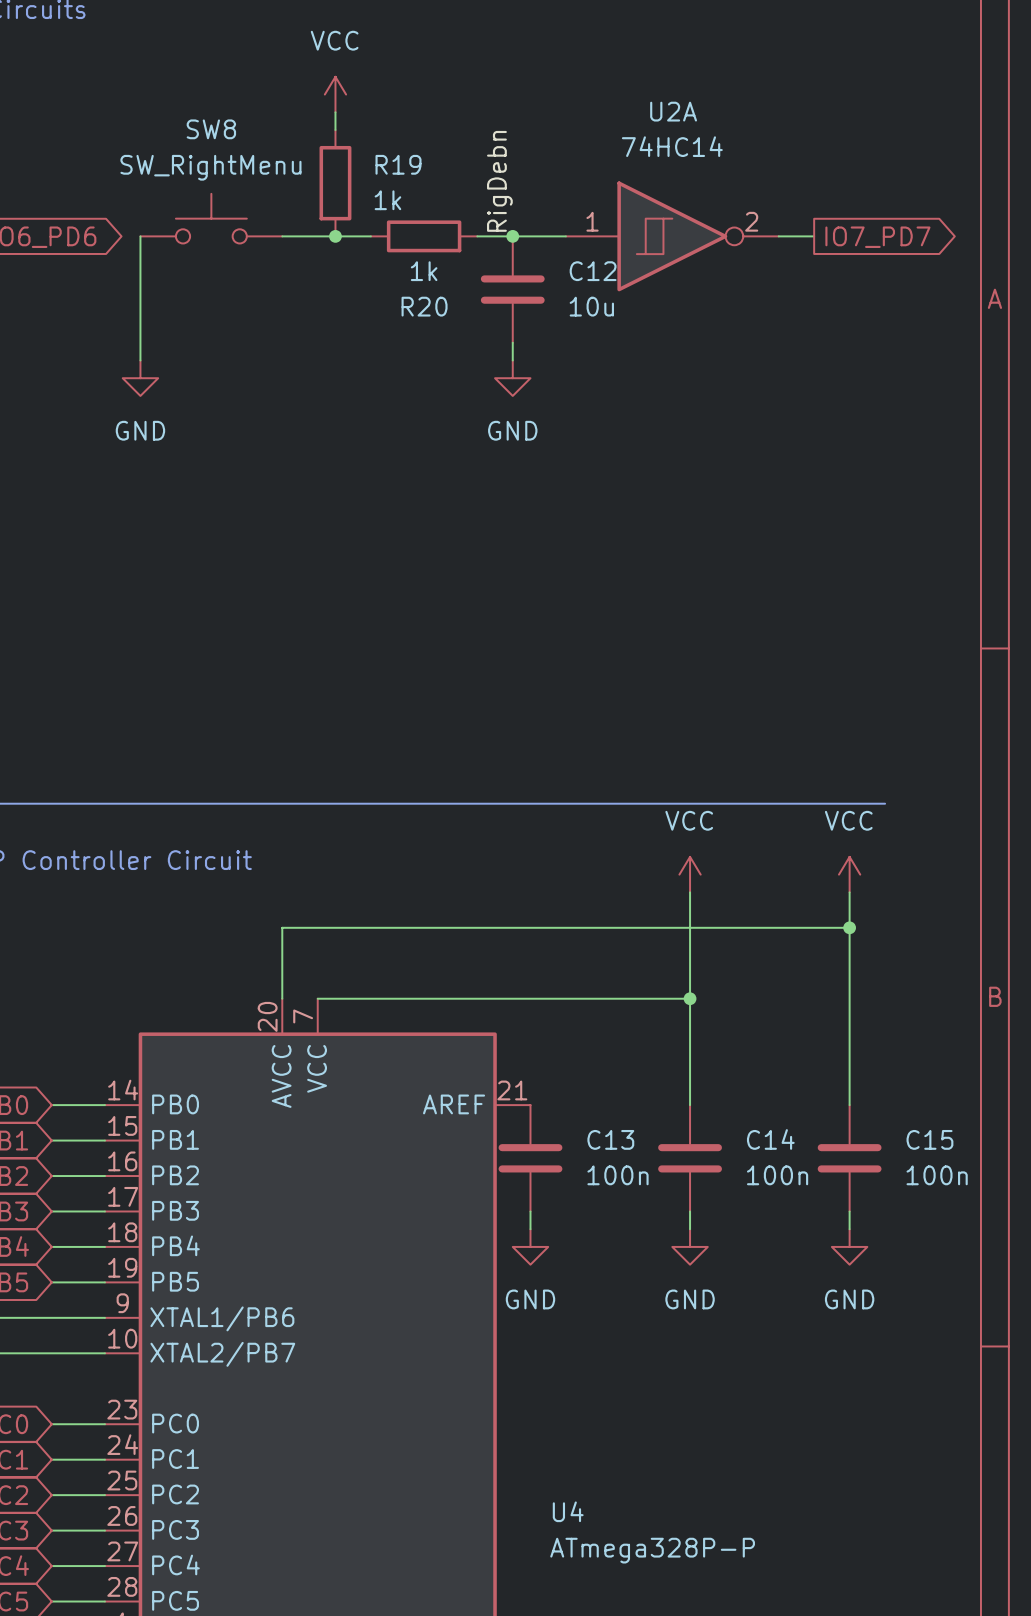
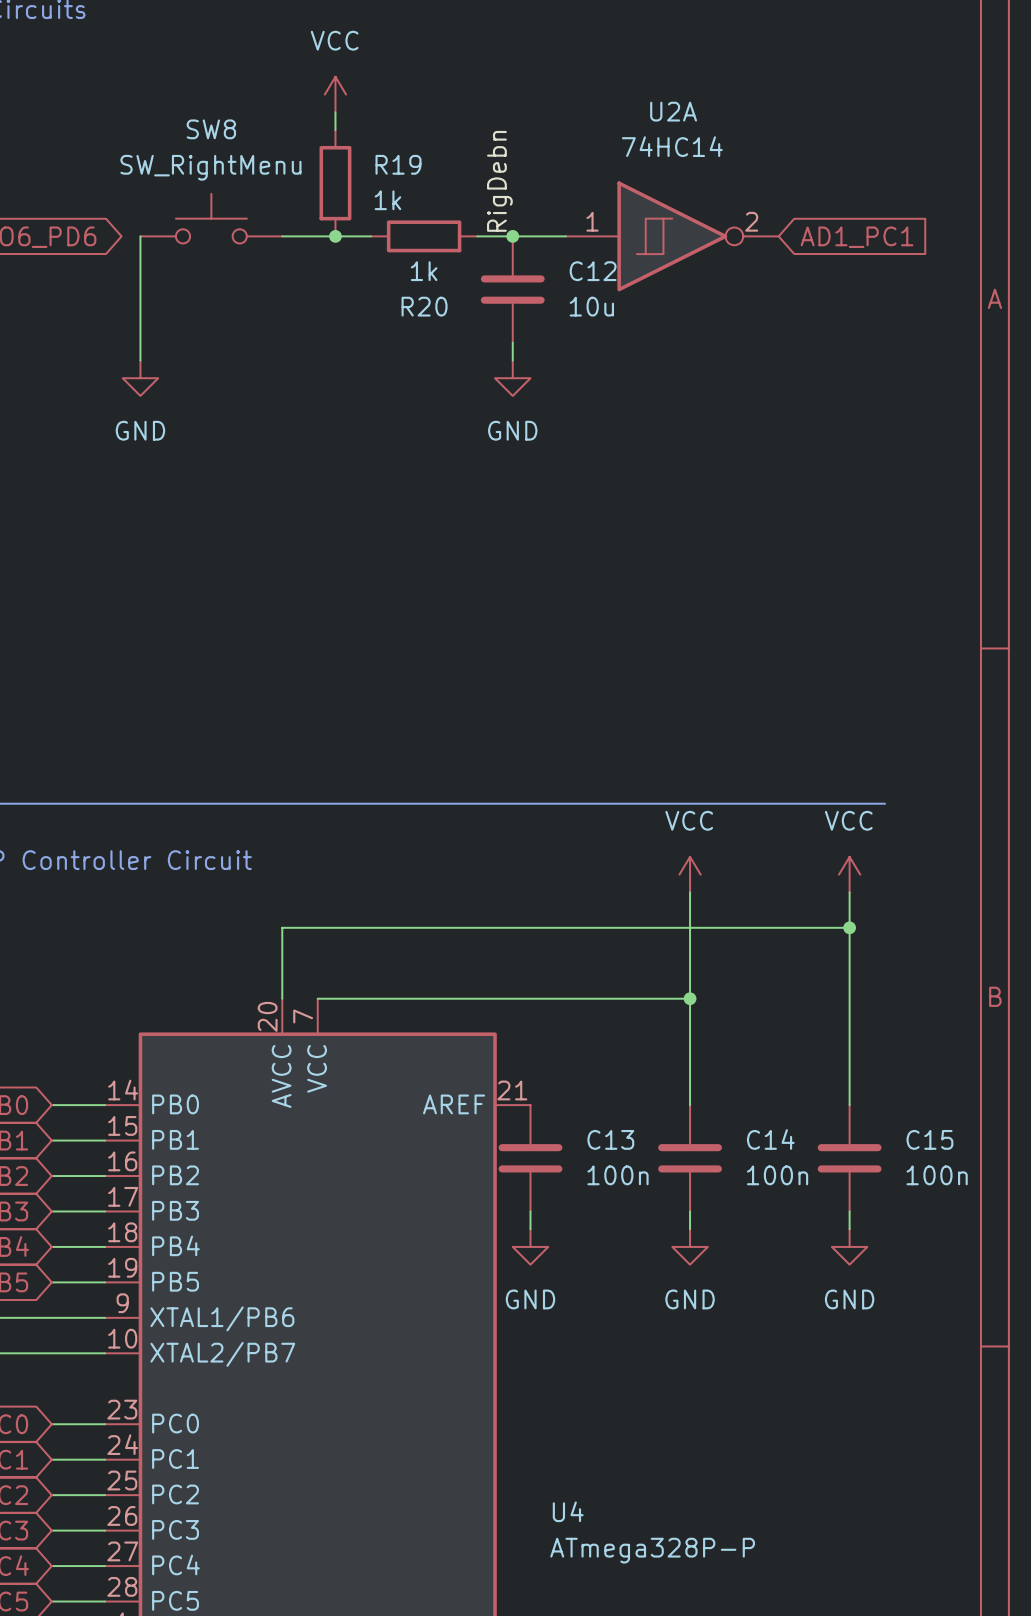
wire: (778, 236) (814, 236) -> none
global label: none -> AD1_PC1 (857, 237)
global label: IO7_PD7 (877, 237) -> none

